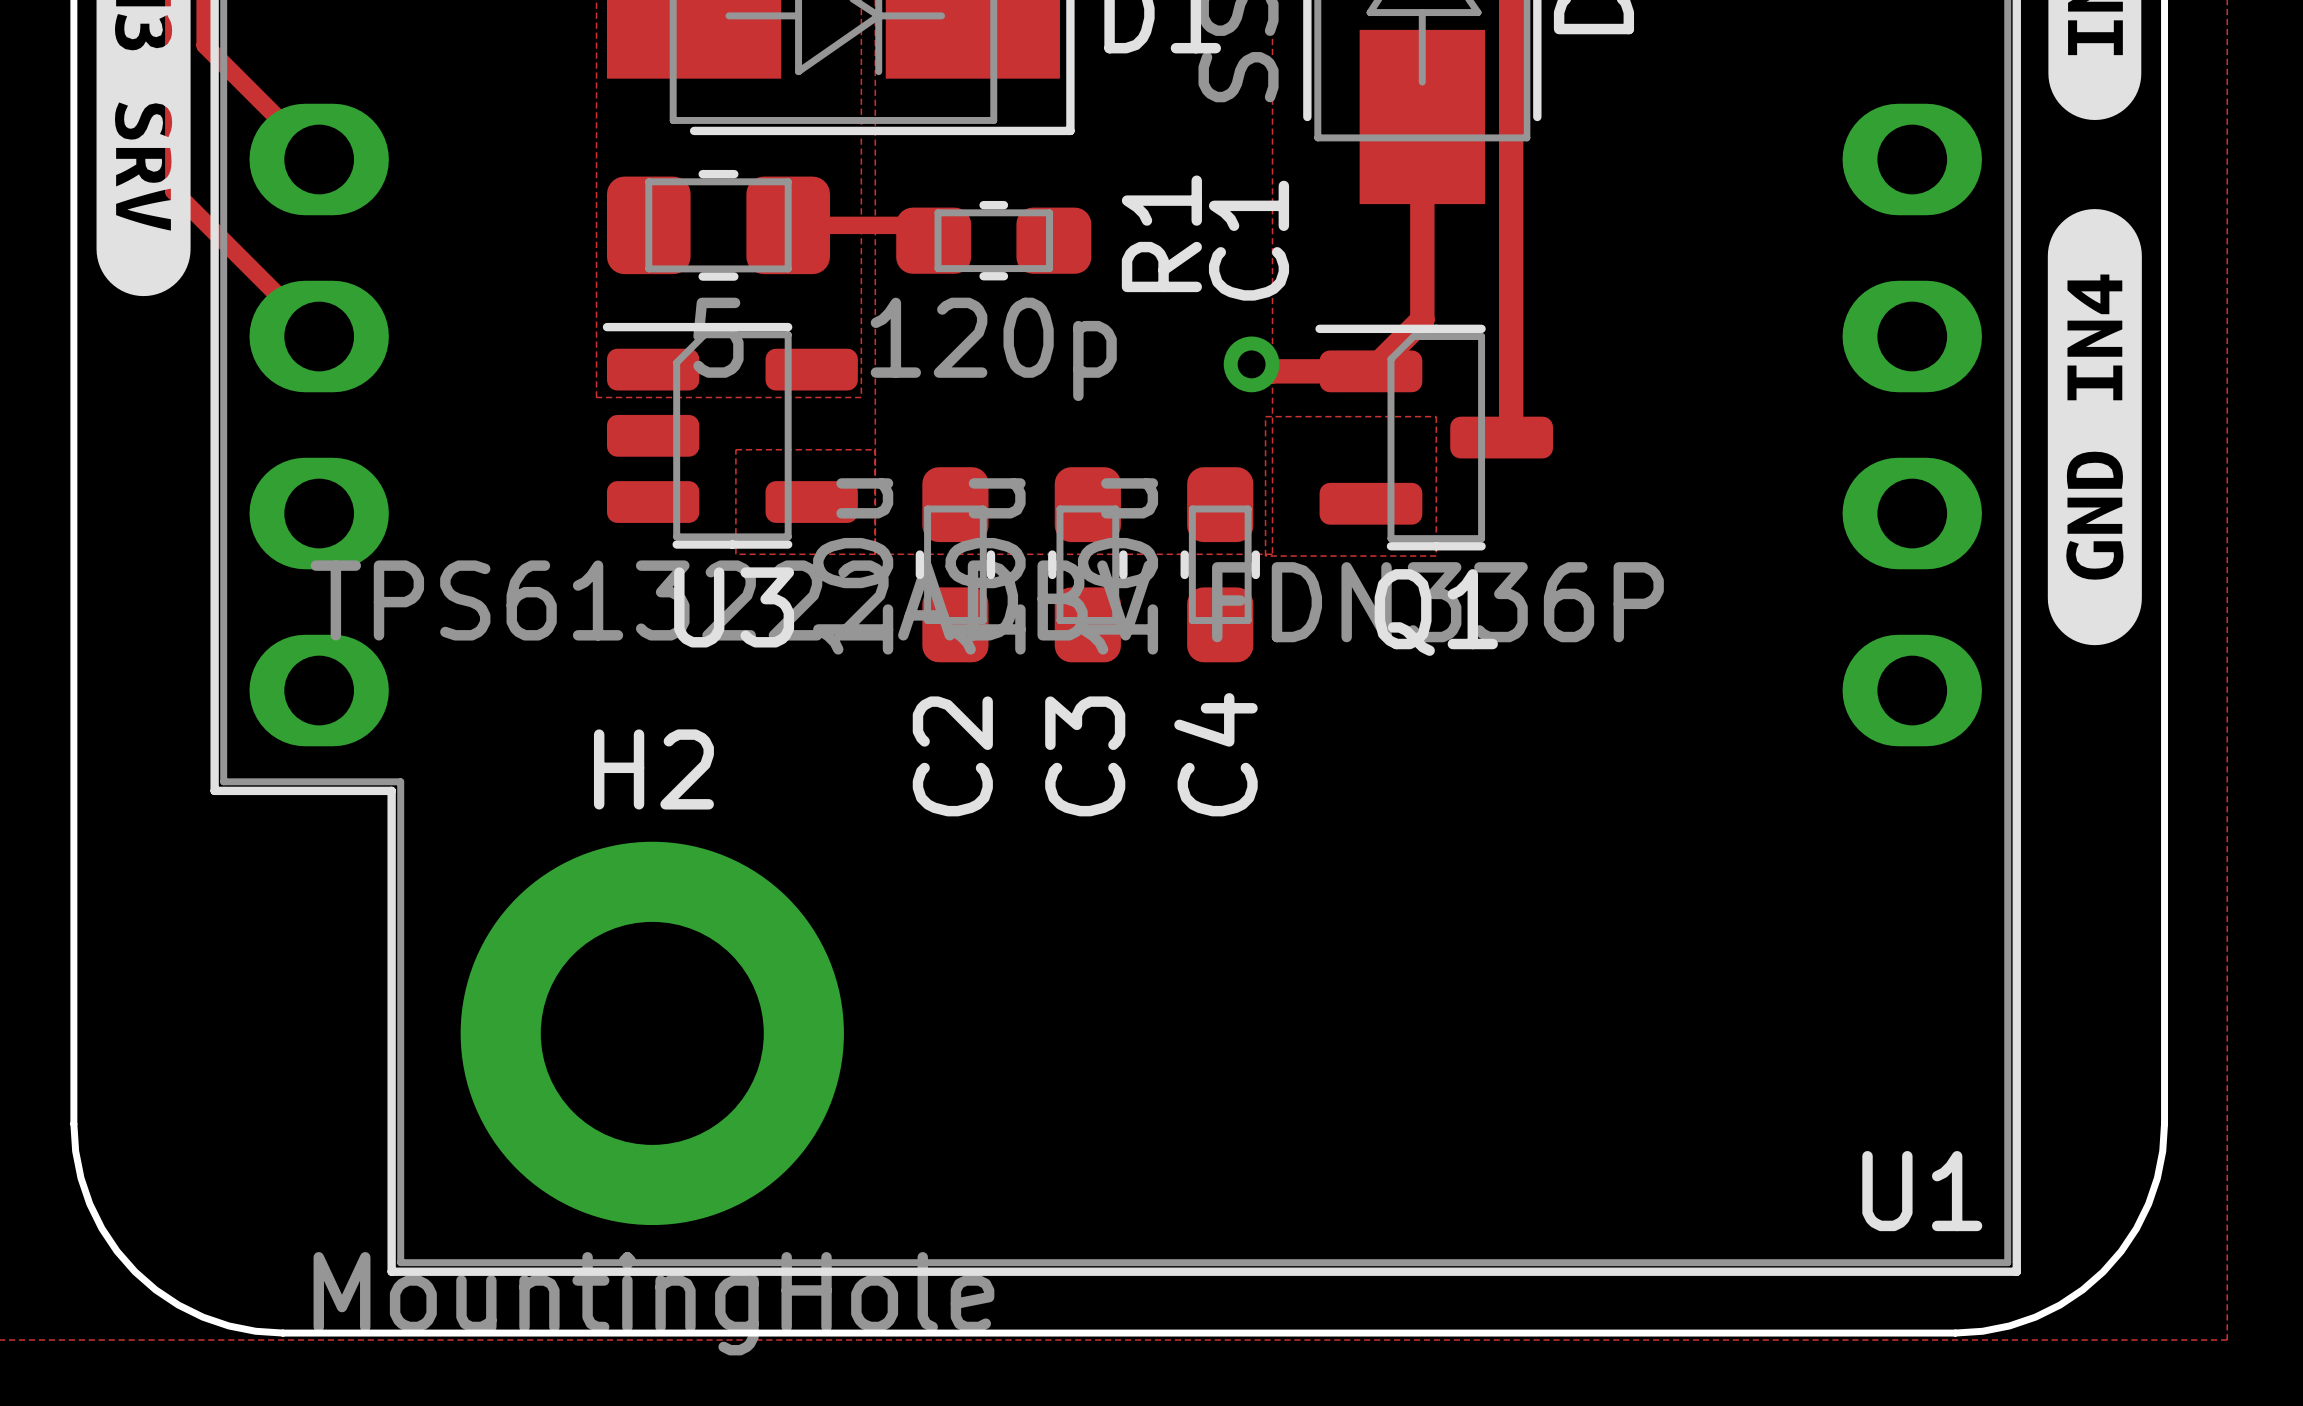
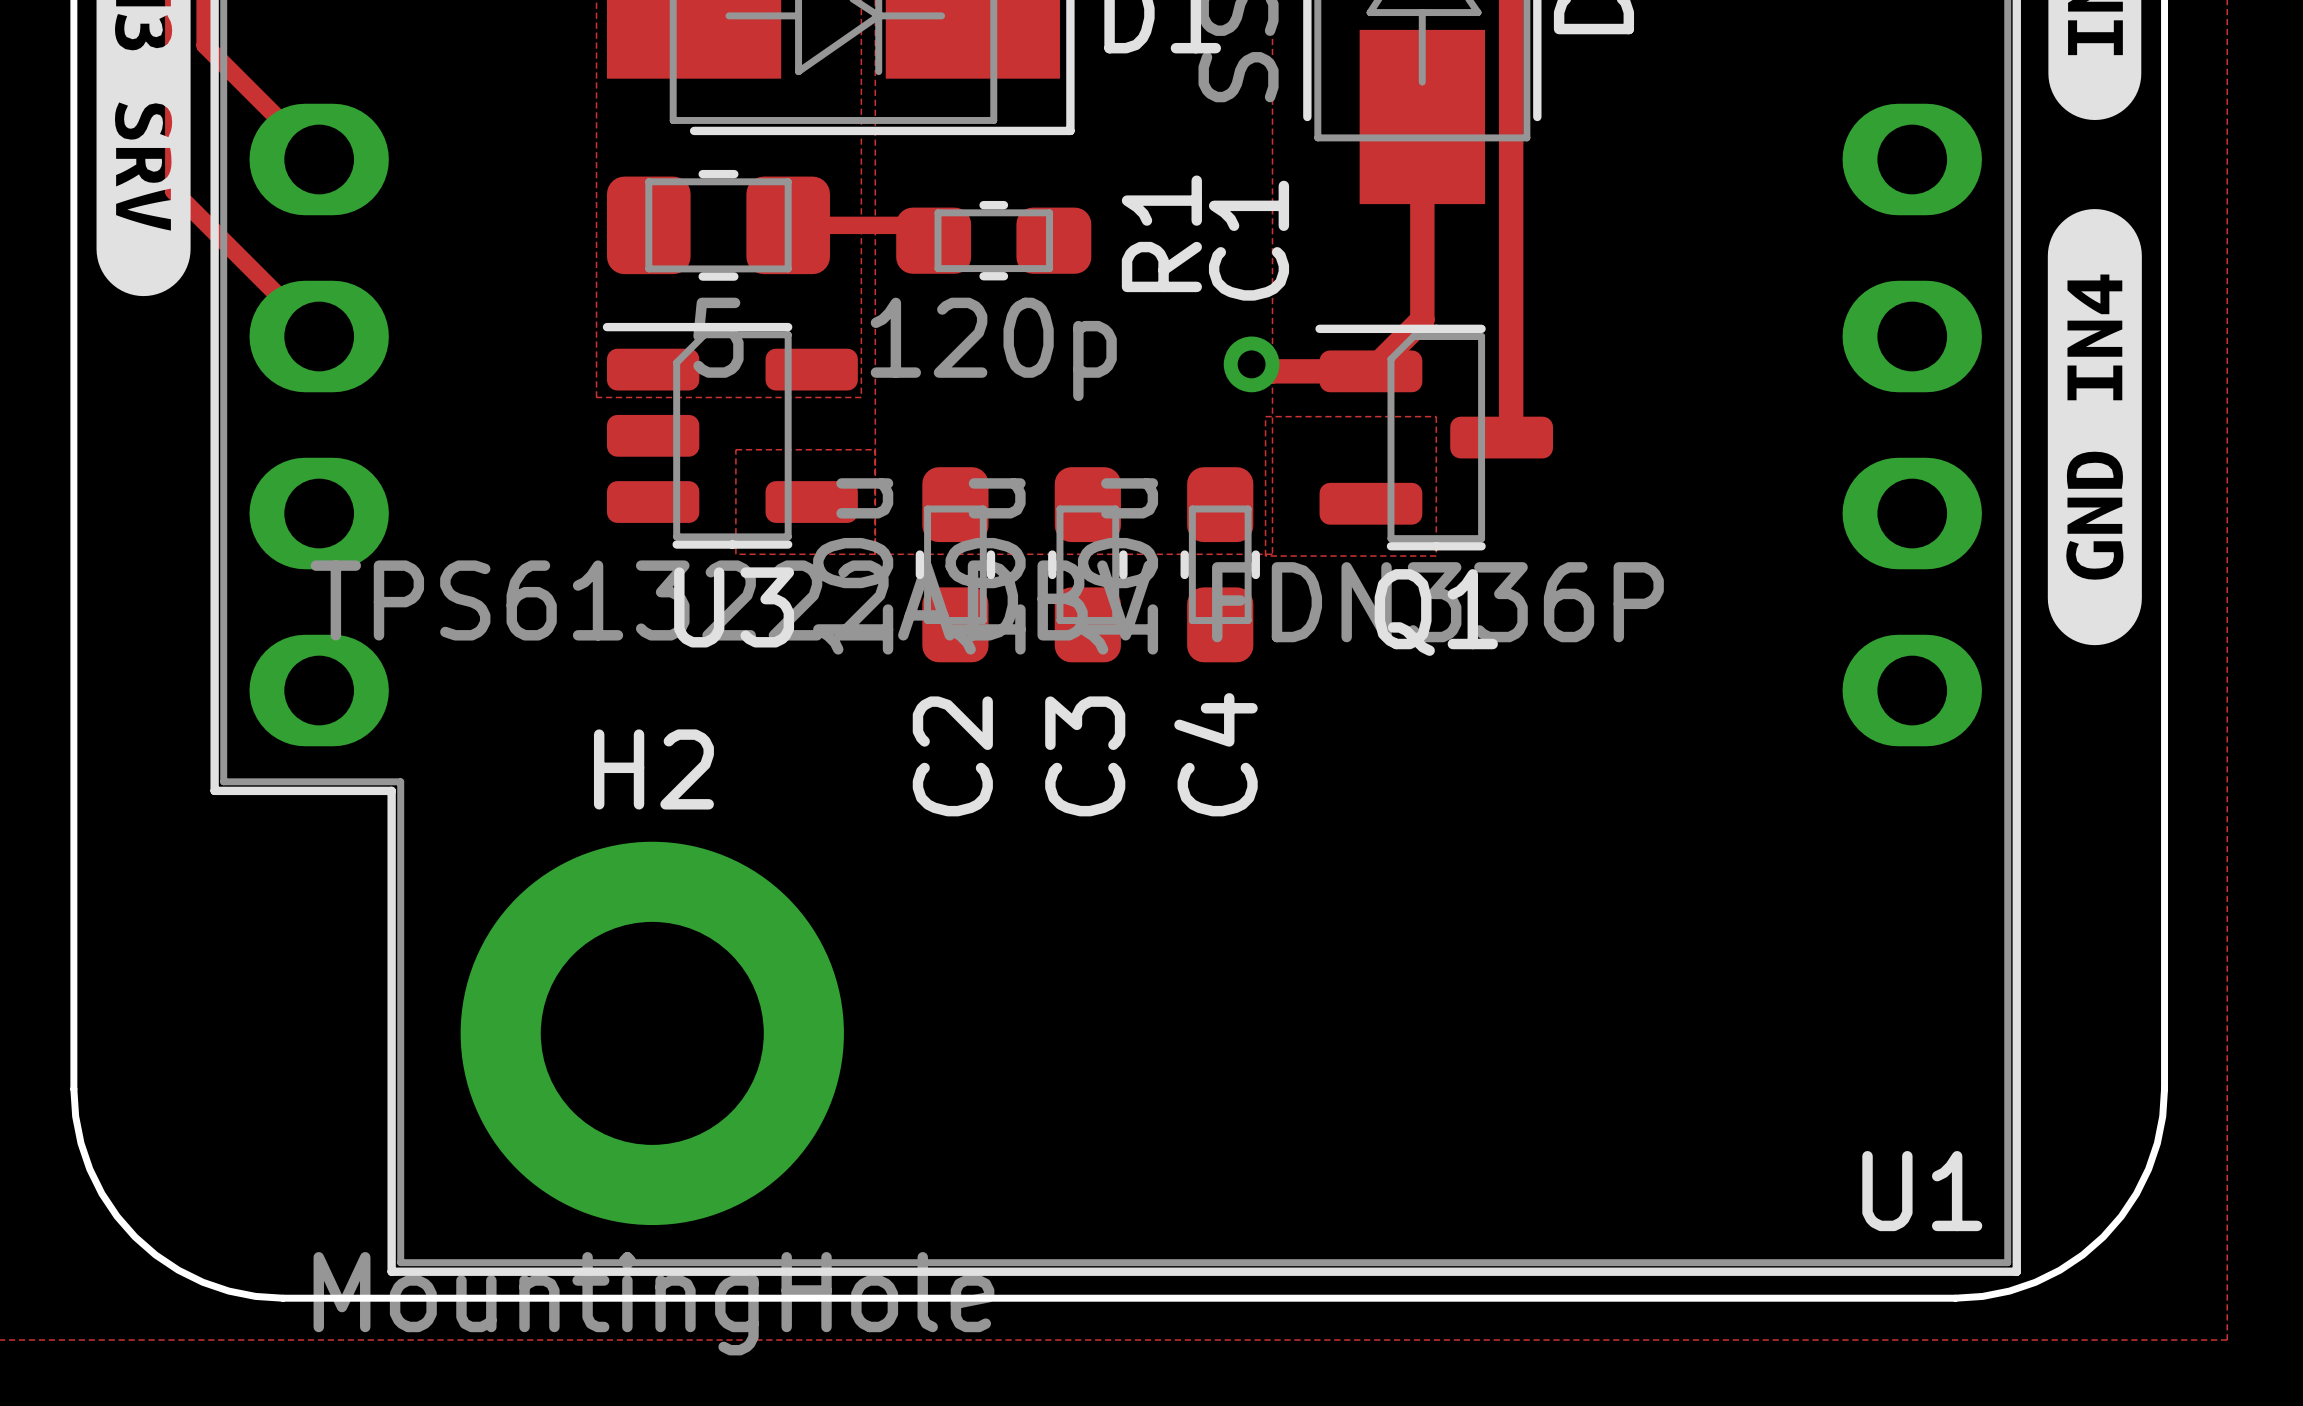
board edge: (73, 1089) (75, 1151) (80, 1178) (89, 1204) (101, 1228) (117, 1251) (135, 1271) (155, 1289) (178, 1305) (202, 1317) (228, 1325) (255, 1331) (282, 1333) (1955, 1333) (1982, 1331) (2009, 1325) (2035, 1317) (2059, 1305) (2082, 1289) (2103, 1271) (2121, 1251) (2136, 1228) (2148, 1204) (2157, 1178) (2162, 1151) (2164, 1089) -> (73, 1089) (75, 1116) (80, 1143) (89, 1169) (101, 1193) (117, 1216) (135, 1236) (155, 1255) (178, 1270) (202, 1282) (228, 1291) (255, 1296) (282, 1298) (1955, 1298) (1982, 1296) (2009, 1291) (2035, 1282) (2059, 1270) (2082, 1255) (2103, 1236) (2121, 1216) (2136, 1193) (2148, 1169) (2157, 1143) (2162, 1116) (2164, 1089)

